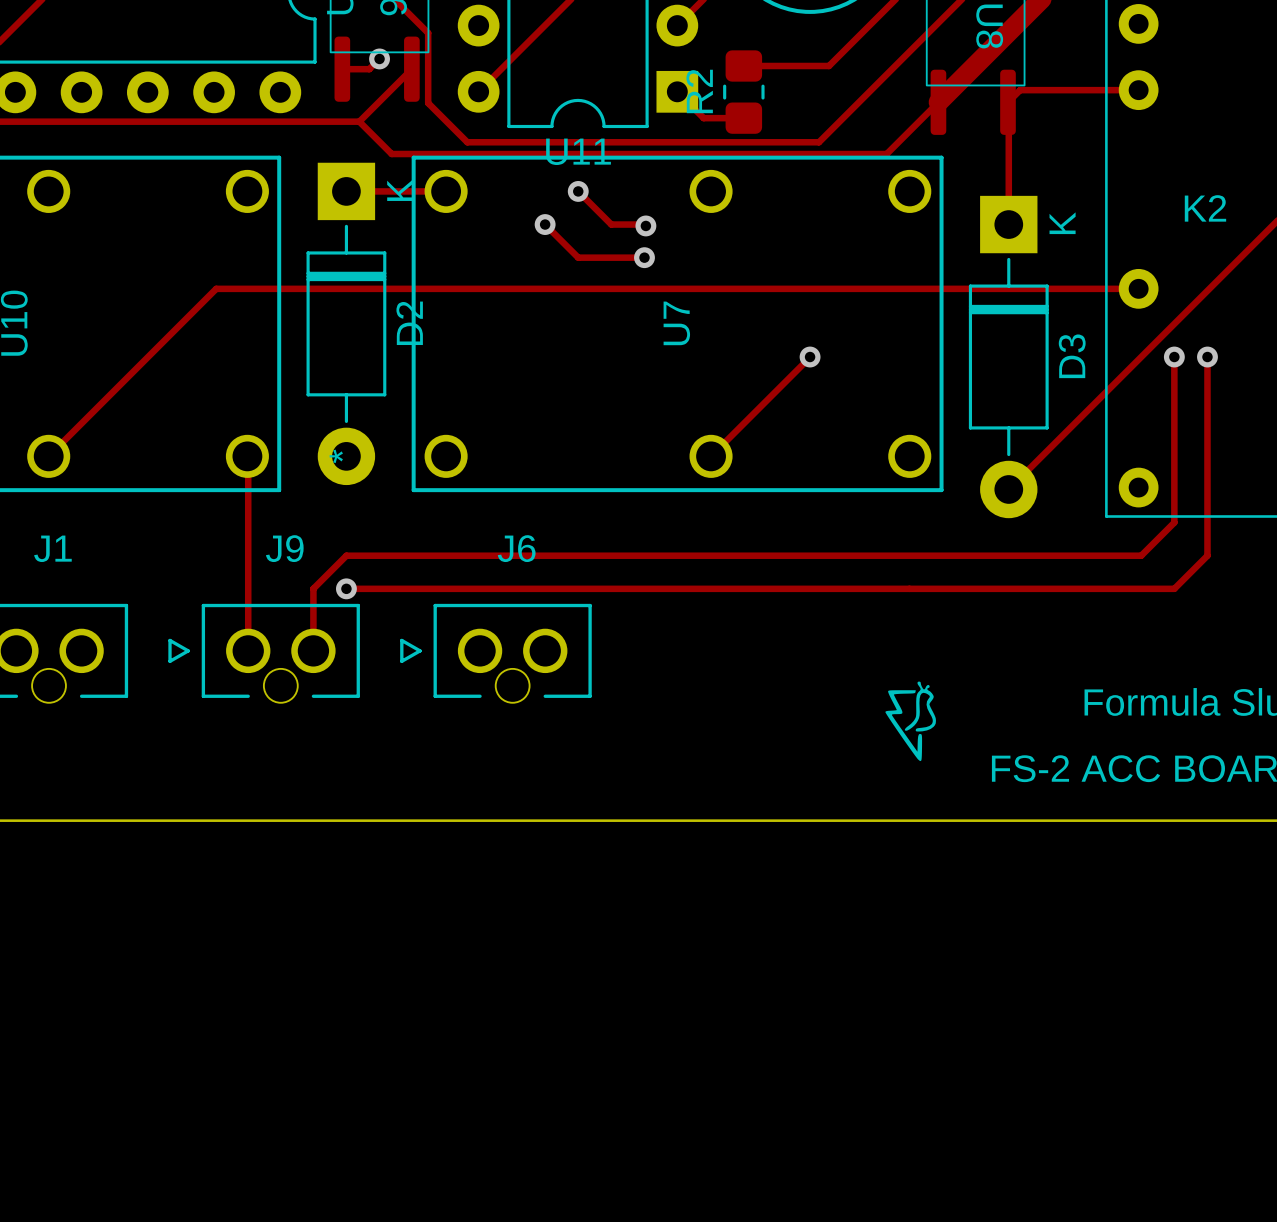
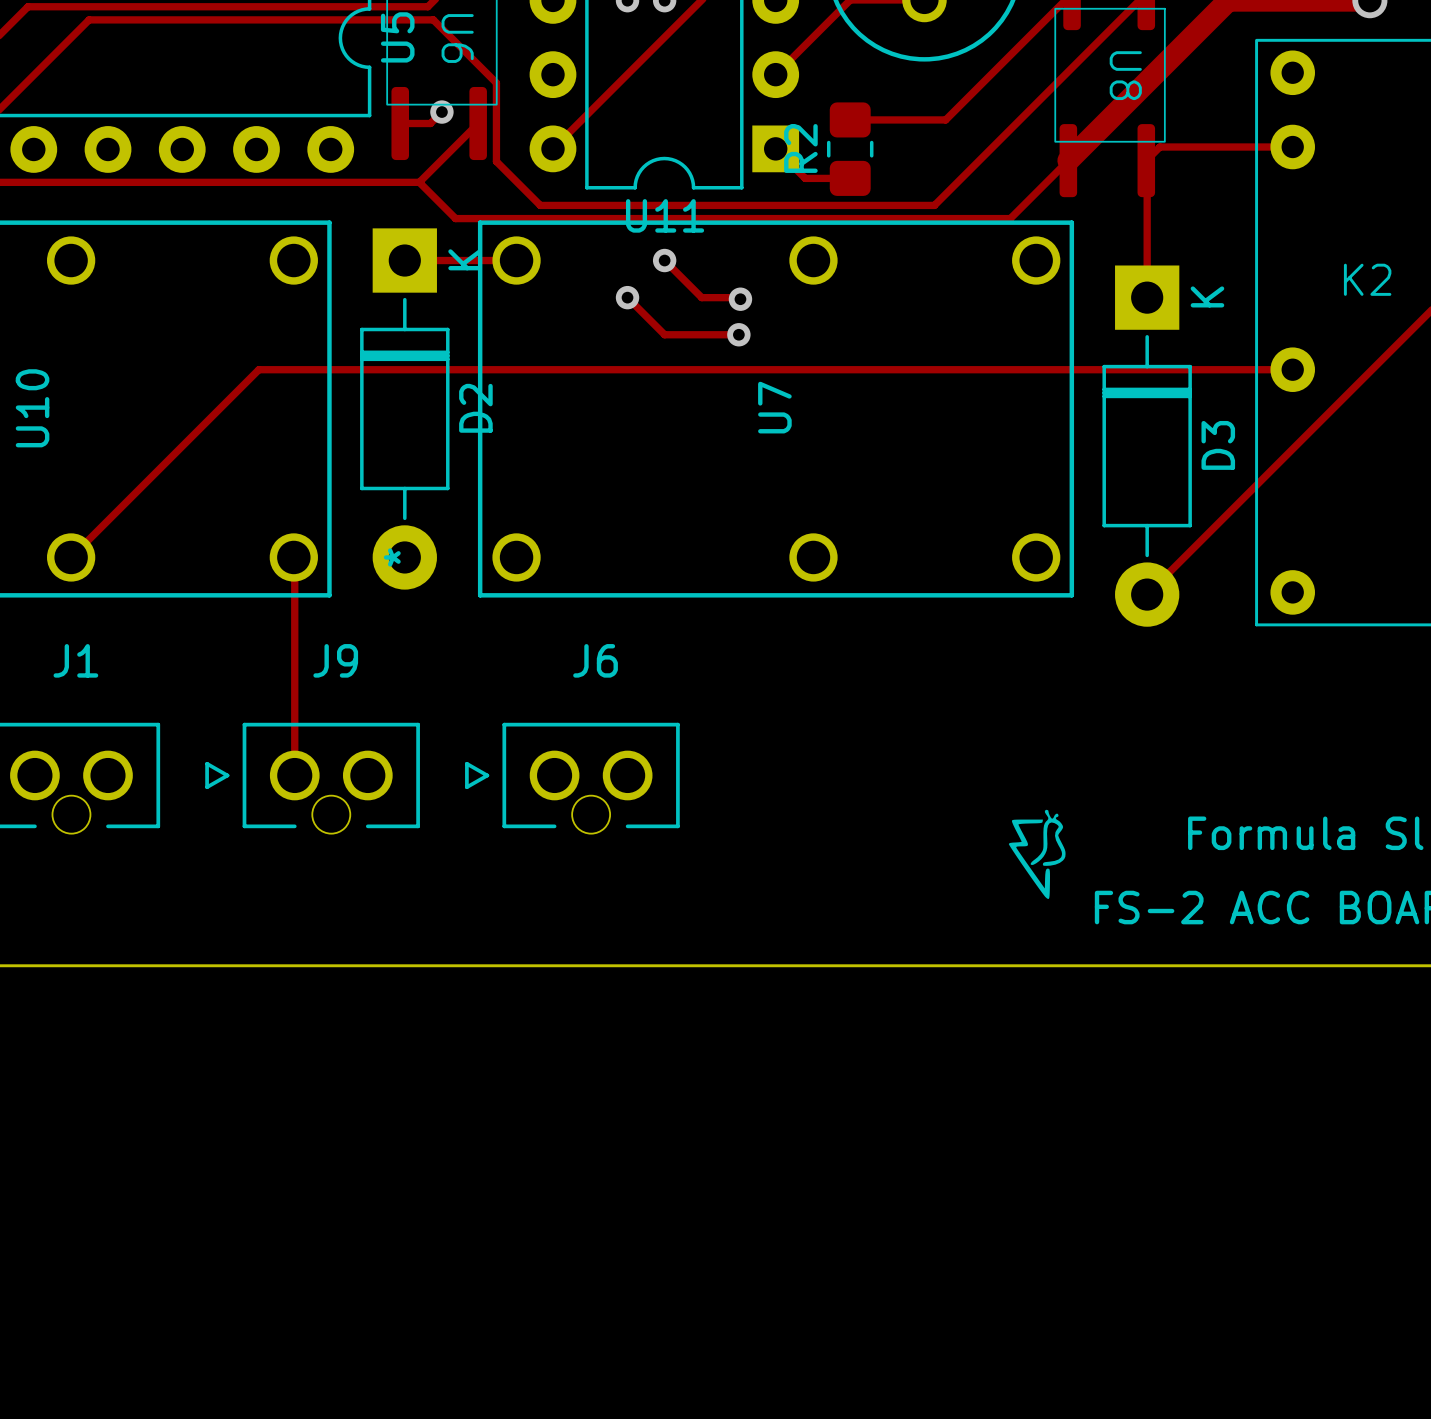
track: (810, 357) (711, 456) -> none
via: (810, 357) -> none
track: (1174, 357) (1174, 522) (1141, 555) (346, 555) (313, 588) (313, 650) -> none
via: (1174, 357) -> none
track: (1207, 357) (1207, 555) (1174, 588) (346, 588) -> none
via: (1207, 357) -> none
via: (346, 588) -> none

